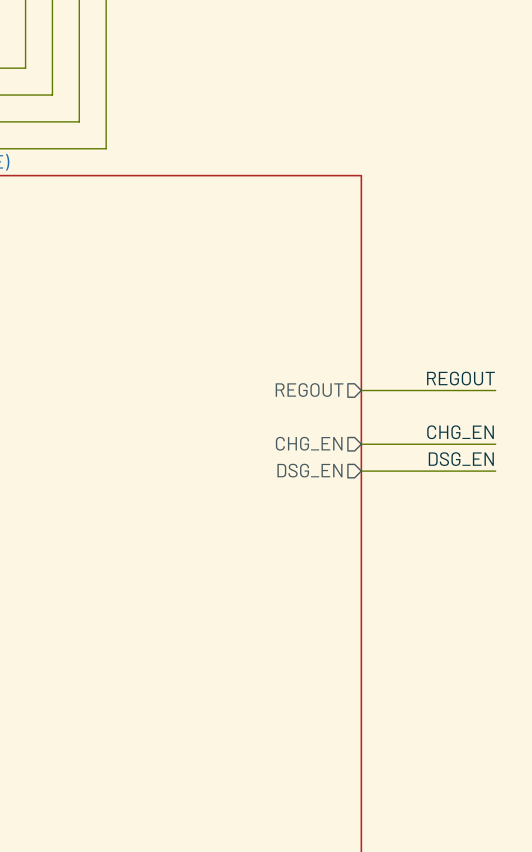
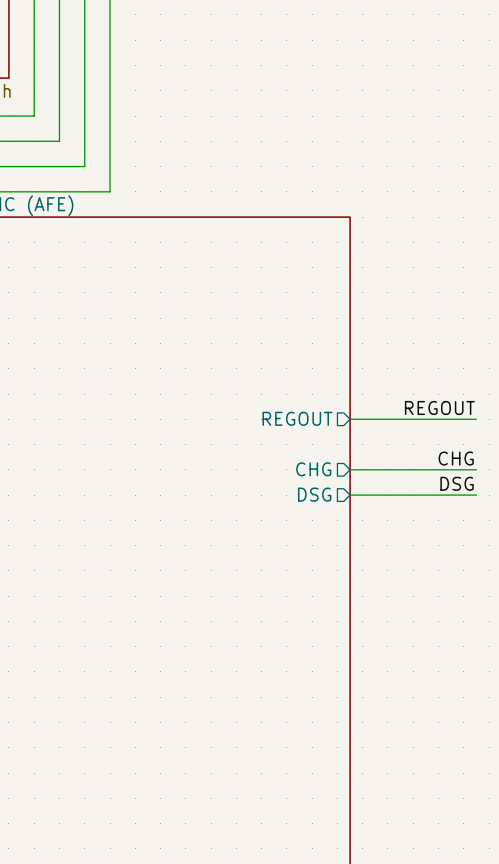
label: CHG_EN (460, 432) -> CHG (456, 458)
sheet pin: CHG_EN (309, 443) -> CHG (313, 469)
label: DSG_EN (461, 459) -> DSG (457, 483)
sheet pin: DSG_EN (309, 470) -> DSG (314, 494)

